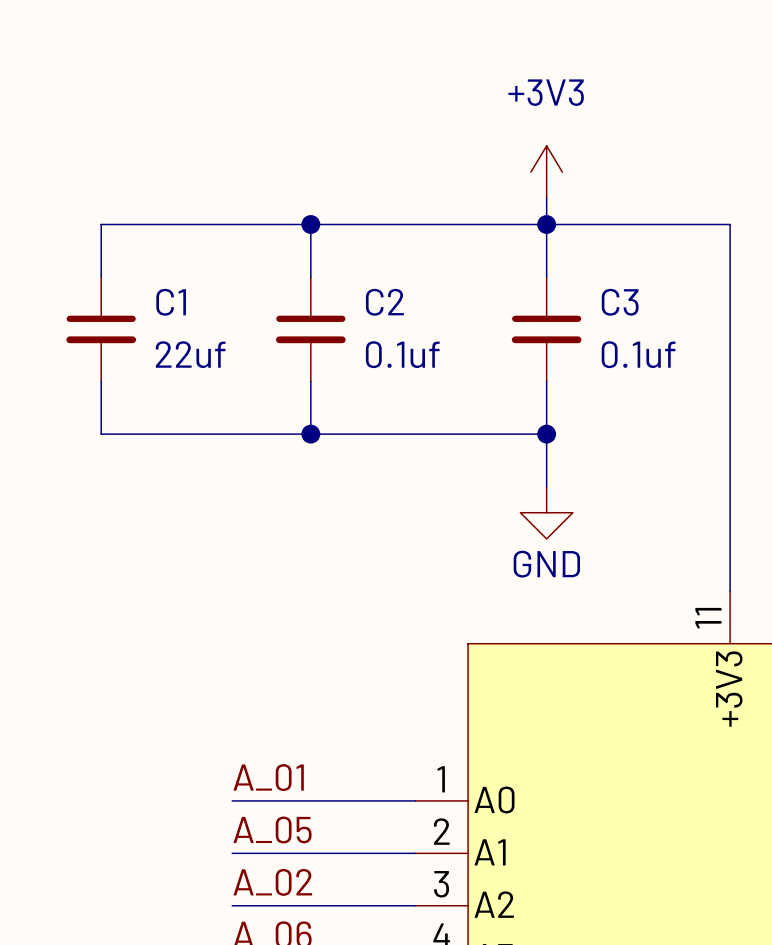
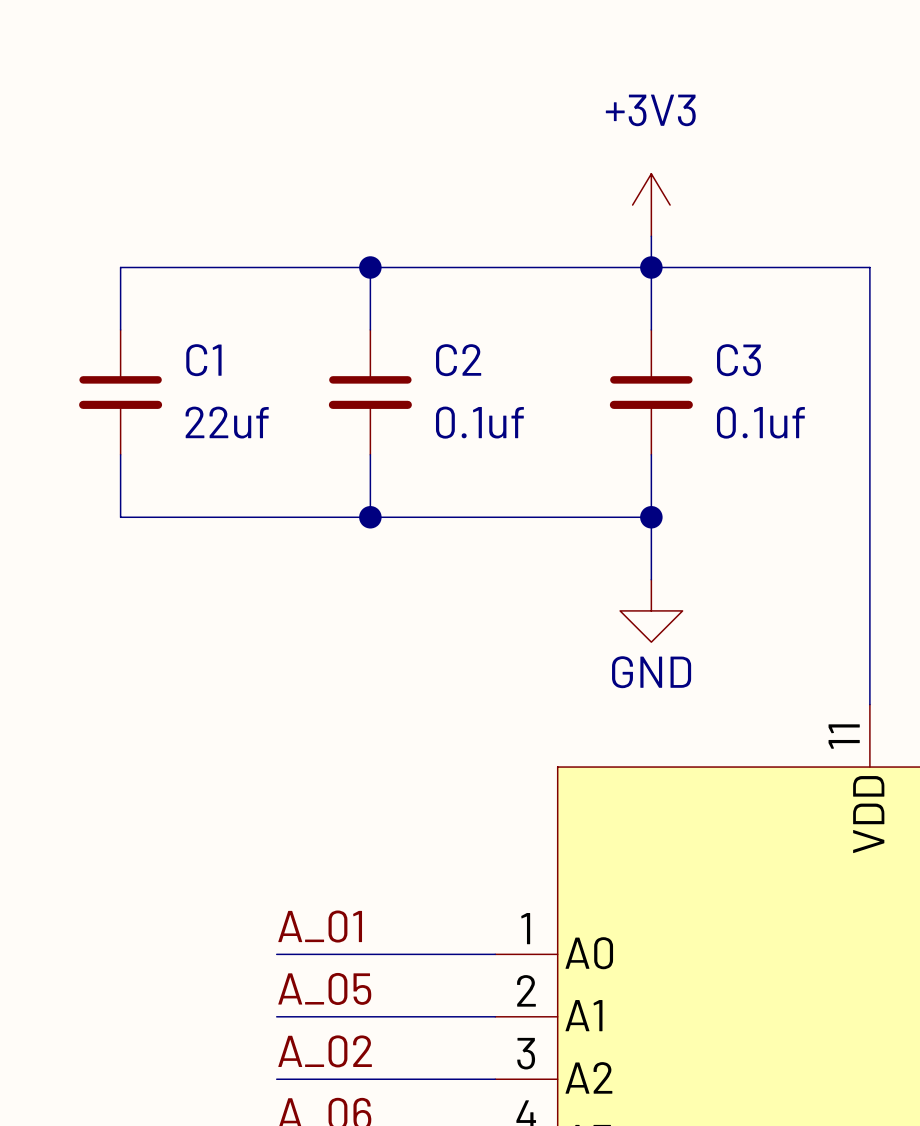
part pin name: +3V3 (729, 689) -> VDD (868, 814)

